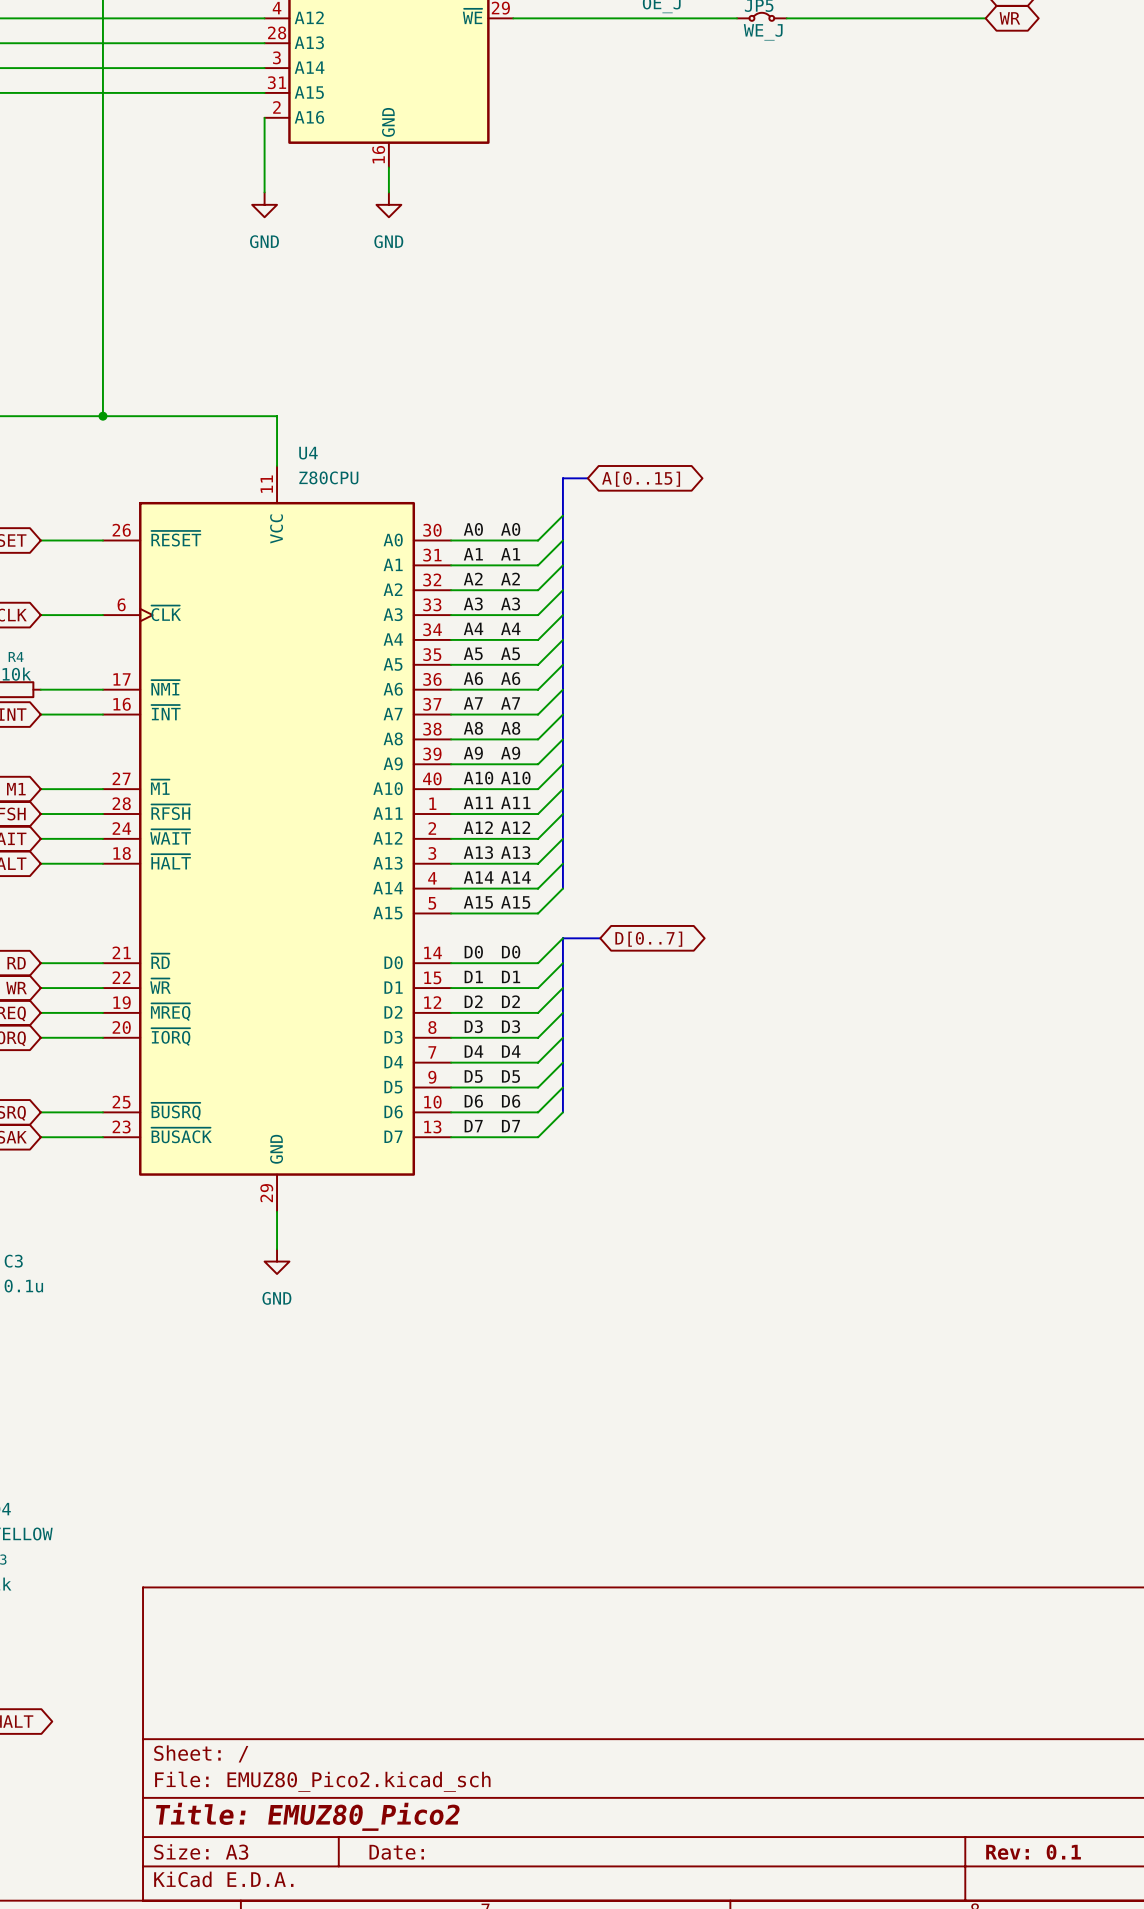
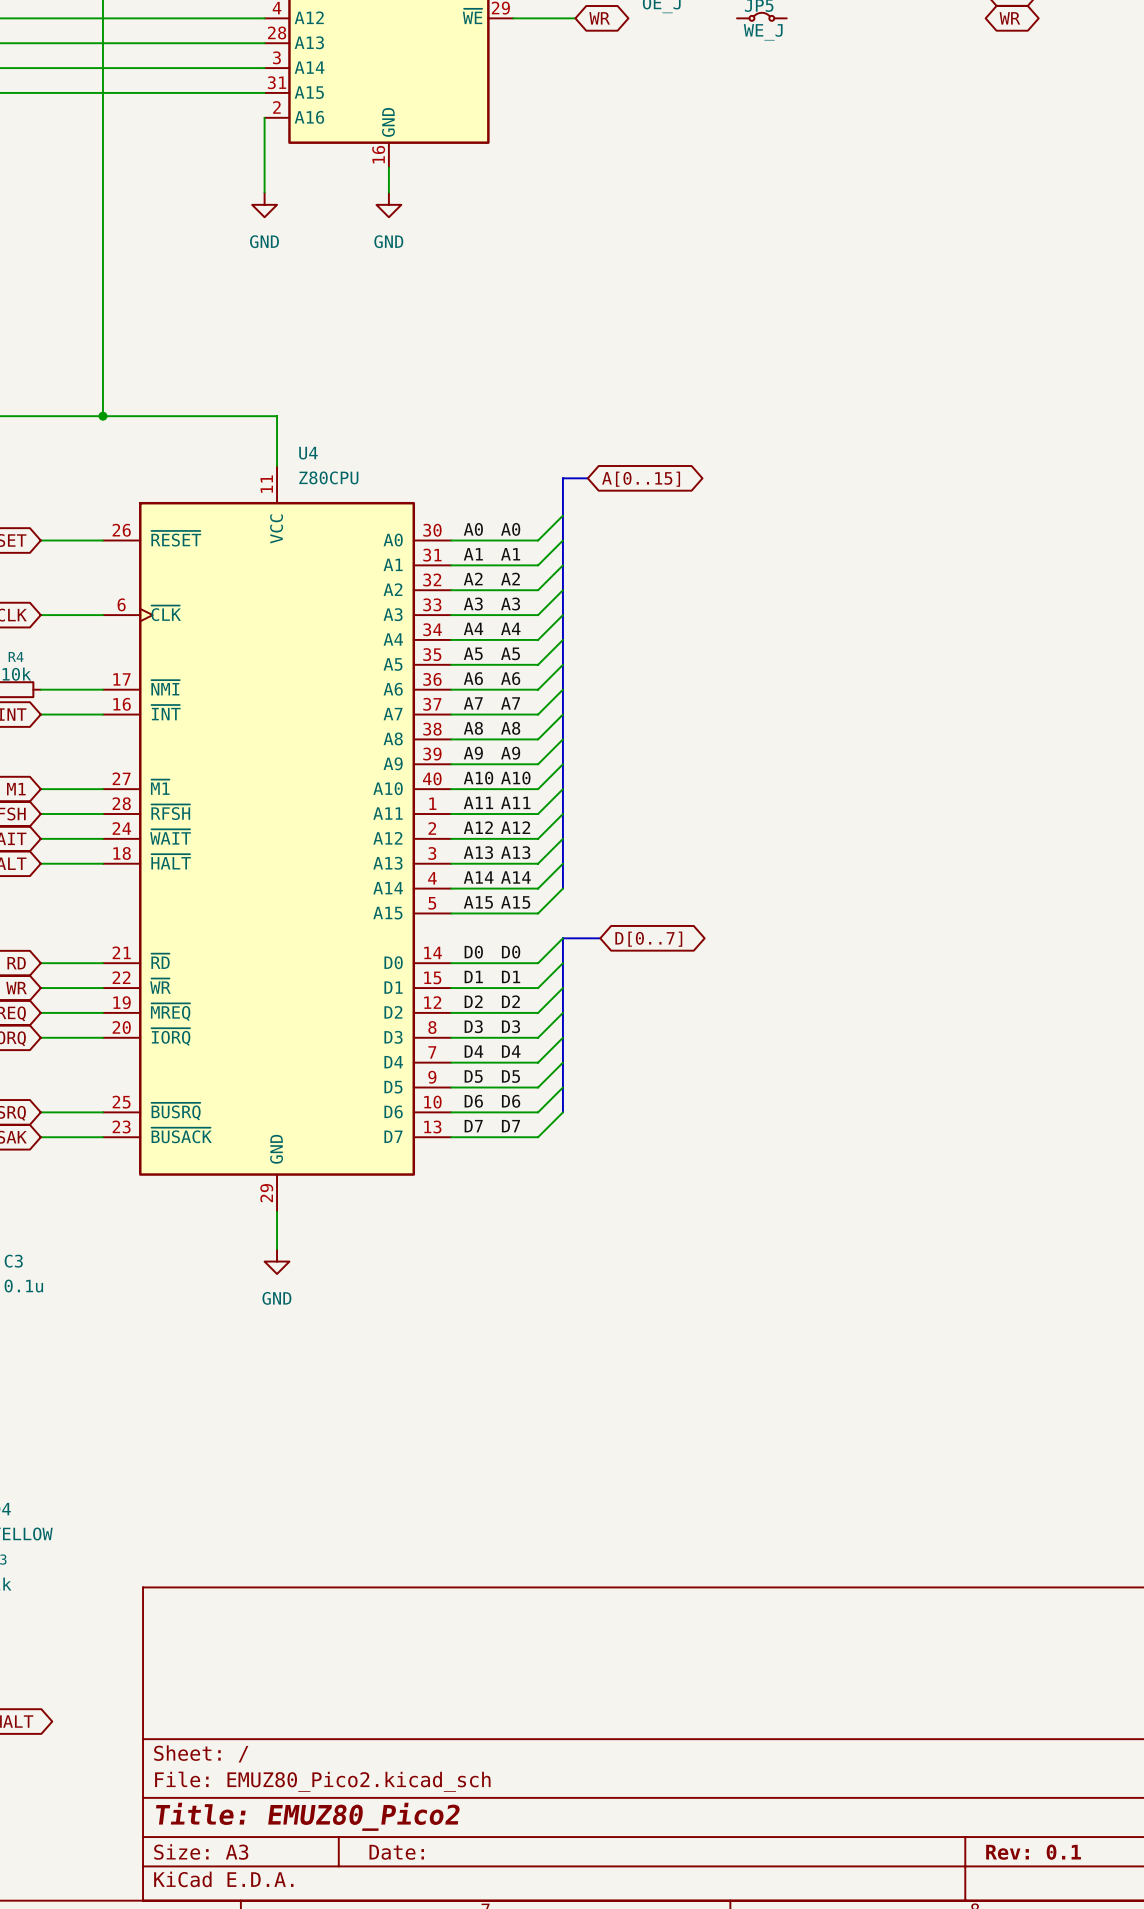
wire: (575, 18) (737, 18) -> none
global label: none -> WR (599, 18)
wire: (786, 18) (985, 18) -> none

